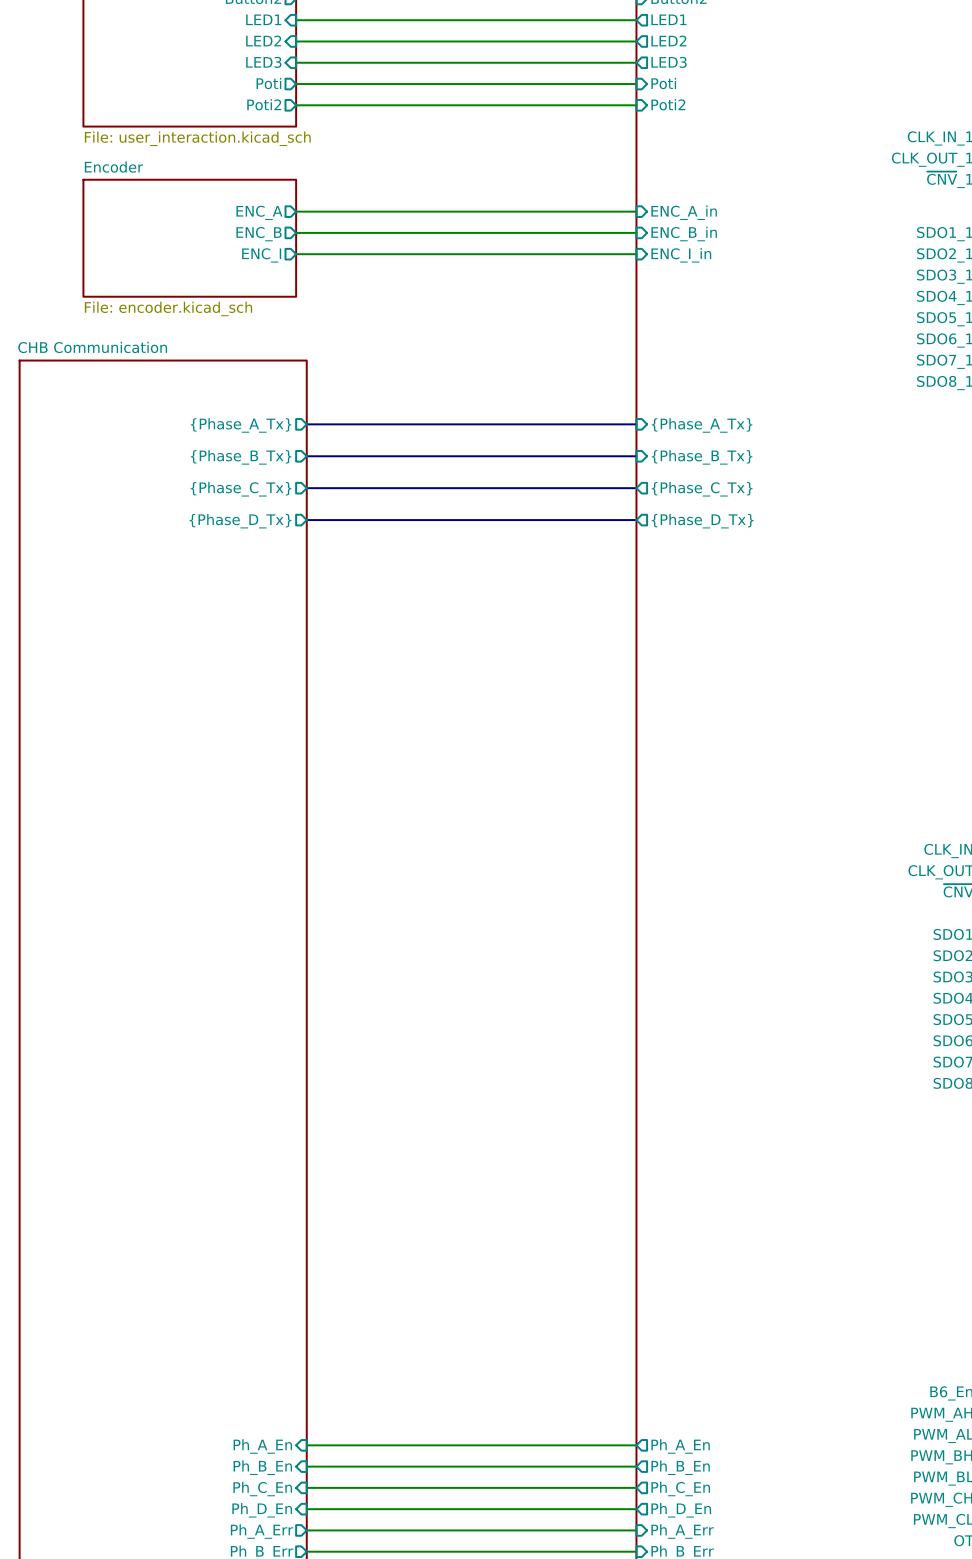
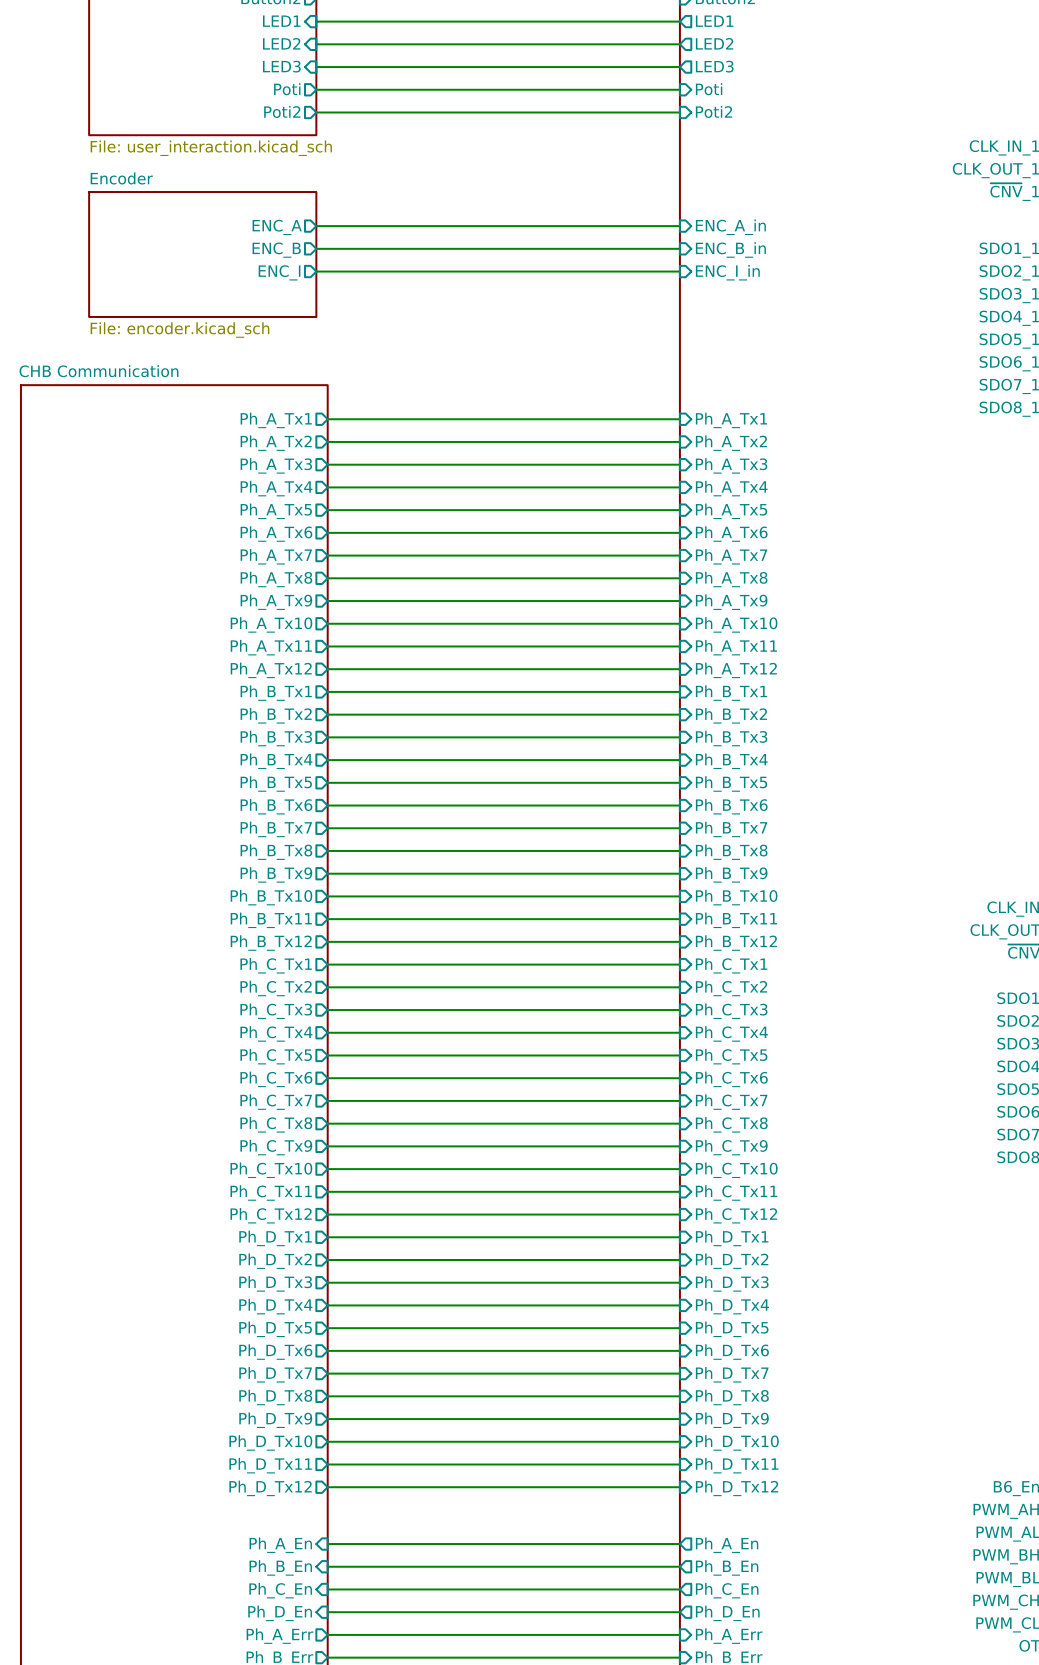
wire: none -> (327, 419) (679, 419)
sheet pin: none -> Ph_A_Tx1 (276, 420)
sheet pin: none -> Ph_A_Tx1 (731, 420)
wire: none -> (327, 441) (679, 441)
sheet pin: none -> Ph_A_Tx2 (276, 443)
sheet pin: none -> Ph_A_Tx2 (731, 443)
bus: (306, 424) (636, 424) -> none
sheet pin: {Phase_A_Tx} (241, 425) -> none
sheet pin: {Phase_A_Tx} (702, 425) -> none
wire: none -> (327, 464) (679, 464)
sheet pin: none -> Ph_A_Tx3 (276, 465)
sheet pin: none -> Ph_A_Tx3 (731, 465)
bus: (306, 456) (636, 456) -> none
sheet pin: {Phase_B_Tx} (241, 457) -> Ph_A_Tx4 (276, 488)
sheet pin: {Phase_B_Tx} (702, 457) -> Ph_A_Tx4 (731, 488)
wire: none -> (327, 510) (679, 510)
sheet pin: none -> Ph_A_Tx5 (276, 511)
sheet pin: none -> Ph_A_Tx5 (731, 511)
bus: (306, 488) (636, 488) -> none
sheet pin: {Phase_C_Tx} (241, 489) -> none
sheet pin: {Phase_C_Tx} (702, 489) -> none
wire: none -> (327, 532) (679, 532)
sheet pin: none -> Ph_A_Tx6 (276, 534)
sheet pin: none -> Ph_A_Tx6 (731, 534)
bus: (306, 520) (636, 520) -> none
sheet pin: {Phase_D_Tx} (240, 521) -> Ph_A_Tx7 (276, 556)
sheet pin shape: output (702, 521) -> input (731, 556)
sheet pin: {Phase_D_Tx} (702, 521) -> Ph_A_Tx7 (731, 556)
wire: none -> (327, 578) (679, 578)
sheet pin: none -> Ph_A_Tx8 (276, 579)
sheet pin: none -> Ph_A_Tx8 (731, 579)
wire: none -> (327, 601) (679, 601)
sheet pin: none -> Ph_A_Tx9 (276, 602)
sheet pin: none -> Ph_A_Tx9 (731, 602)
wire: none -> (327, 623) (679, 623)
sheet pin: none -> Ph_A_Tx10 (271, 624)
sheet pin: none -> Ph_A_Tx10 (736, 624)
wire: none -> (327, 646) (679, 646)
sheet pin: none -> Ph_A_Tx11 (271, 647)
sheet pin: none -> Ph_A_Tx11 (736, 647)
wire: none -> (327, 669) (679, 669)
sheet pin: none -> Ph_A_Tx12 (271, 670)
sheet pin: none -> Ph_A_Tx12 (736, 670)
wire: none -> (327, 691) (679, 691)
sheet pin: none -> Ph_B_Tx1 (276, 693)
sheet pin: none -> Ph_B_Tx1 (731, 693)
wire: none -> (327, 714) (679, 714)
sheet pin: none -> Ph_B_Tx2 (276, 715)
sheet pin: none -> Ph_B_Tx2 (731, 715)
wire: none -> (327, 737) (679, 737)
sheet pin: none -> Ph_B_Tx3 (276, 738)
sheet pin: none -> Ph_B_Tx3 (731, 738)
wire: none -> (327, 760) (679, 760)
sheet pin: none -> Ph_B_Tx4 (276, 761)
sheet pin: none -> Ph_B_Tx4 (731, 761)
wire: none -> (327, 782) (679, 782)
sheet pin: none -> Ph_B_Tx5 (276, 783)
sheet pin: none -> Ph_B_Tx5 (731, 783)
wire: none -> (327, 805) (679, 805)
sheet pin: none -> Ph_B_Tx6 (276, 806)
sheet pin: none -> Ph_B_Tx6 (731, 806)
wire: none -> (327, 828) (679, 828)
sheet pin: none -> Ph_B_Tx7 (276, 829)
sheet pin: none -> Ph_B_Tx7 (731, 829)
wire: none -> (327, 850) (679, 850)
sheet pin: none -> Ph_B_Tx8 (276, 852)
sheet pin: none -> Ph_B_Tx8 (731, 852)
wire: none -> (327, 873) (679, 873)
sheet pin: none -> Ph_B_Tx9 (276, 874)
sheet pin: none -> Ph_B_Tx9 (731, 874)
wire: none -> (327, 896) (679, 896)
sheet pin: none -> Ph_B_Tx10 (271, 897)
sheet pin: none -> Ph_B_Tx10 (736, 897)
wire: none -> (327, 919) (679, 919)
sheet pin: none -> Ph_B_Tx11 (271, 920)
sheet pin: none -> Ph_B_Tx11 (736, 920)
wire: none -> (327, 941) (679, 941)
sheet pin: none -> Ph_B_Tx12 (271, 943)
sheet pin: none -> Ph_B_Tx12 (736, 943)
wire: none -> (327, 964) (679, 964)
sheet pin: none -> Ph_C_Tx1 (276, 965)
sheet pin: none -> Ph_C_Tx1 (731, 965)
wire: none -> (327, 987) (679, 987)
sheet pin: none -> Ph_C_Tx2 (276, 988)
sheet pin: none -> Ph_C_Tx2 (731, 988)
wire: none -> (327, 1010) (679, 1010)
sheet pin: none -> Ph_C_Tx3 (276, 1011)
sheet pin: none -> Ph_C_Tx3 (731, 1011)
wire: none -> (327, 1032) (679, 1032)
sheet pin: none -> Ph_C_Tx4 (276, 1033)
sheet pin: none -> Ph_C_Tx4 (731, 1033)
wire: none -> (327, 1055) (679, 1055)
sheet pin: none -> Ph_C_Tx5 (276, 1056)
sheet pin: none -> Ph_C_Tx5 (731, 1056)
wire: none -> (327, 1078) (679, 1078)
sheet pin: none -> Ph_C_Tx6 (276, 1079)
sheet pin: none -> Ph_C_Tx6 (731, 1079)
wire: none -> (327, 1100) (679, 1100)
sheet pin: none -> Ph_C_Tx7 (276, 1102)
sheet pin: none -> Ph_C_Tx7 (731, 1102)
wire: none -> (327, 1123) (679, 1123)
sheet pin: none -> Ph_C_Tx8 (276, 1124)
sheet pin: none -> Ph_C_Tx8 (731, 1124)
wire: none -> (327, 1146) (679, 1146)
sheet pin: none -> Ph_C_Tx9 (276, 1147)
sheet pin: none -> Ph_C_Tx9 (731, 1147)
wire: none -> (327, 1169) (679, 1169)
sheet pin: none -> Ph_C_Tx10 (271, 1170)
sheet pin: none -> Ph_C_Tx10 (736, 1170)
wire: none -> (327, 1191) (679, 1191)
sheet pin: none -> Ph_C_Tx11 (271, 1192)
sheet pin: none -> Ph_C_Tx11 (736, 1192)
wire: none -> (327, 1214) (679, 1214)
sheet pin: none -> Ph_C_Tx12 (271, 1215)
sheet pin: none -> Ph_C_Tx12 (736, 1215)
wire: none -> (327, 1237) (679, 1237)
sheet pin: none -> Ph_D_Tx1 (275, 1238)
sheet pin: none -> Ph_D_Tx1 (732, 1238)
wire: none -> (327, 1259) (679, 1259)
sheet pin: none -> Ph_D_Tx2 (275, 1261)
sheet pin: none -> Ph_D_Tx2 (732, 1261)
wire: none -> (327, 1282) (679, 1282)
sheet pin: none -> Ph_D_Tx3 (275, 1283)
sheet pin: none -> Ph_D_Tx3 (732, 1283)
wire: none -> (327, 1305) (679, 1305)
sheet pin: none -> Ph_D_Tx4 (275, 1306)
sheet pin: none -> Ph_D_Tx4 (732, 1306)
wire: none -> (327, 1328) (679, 1328)
sheet pin: none -> Ph_D_Tx5 (275, 1329)
sheet pin: none -> Ph_D_Tx5 (732, 1329)
wire: none -> (327, 1350) (679, 1350)
sheet pin: none -> Ph_D_Tx6 (275, 1352)
sheet pin: none -> Ph_D_Tx6 (732, 1352)
wire: none -> (327, 1373) (679, 1373)
sheet pin: none -> Ph_D_Tx7 (275, 1374)
sheet pin: none -> Ph_D_Tx7 (732, 1374)
wire: none -> (327, 1396) (679, 1396)
sheet pin: none -> Ph_D_Tx8 (275, 1397)
sheet pin: none -> Ph_D_Tx8 (732, 1397)
wire: none -> (327, 1419) (679, 1419)
sheet pin: none -> Ph_D_Tx9 (275, 1420)
sheet pin: none -> Ph_D_Tx9 (732, 1420)
wire: none -> (327, 1441) (679, 1441)
sheet pin: none -> Ph_D_Tx10 (270, 1442)
sheet pin: none -> Ph_D_Tx10 (737, 1442)
wire: none -> (327, 1464) (679, 1464)
sheet pin: none -> Ph_D_Tx11 (270, 1465)
sheet pin: none -> Ph_D_Tx11 (737, 1465)
wire: none -> (327, 1487) (679, 1487)
sheet pin: none -> Ph_D_Tx12 (270, 1488)
sheet pin: none -> Ph_D_Tx12 (737, 1488)

